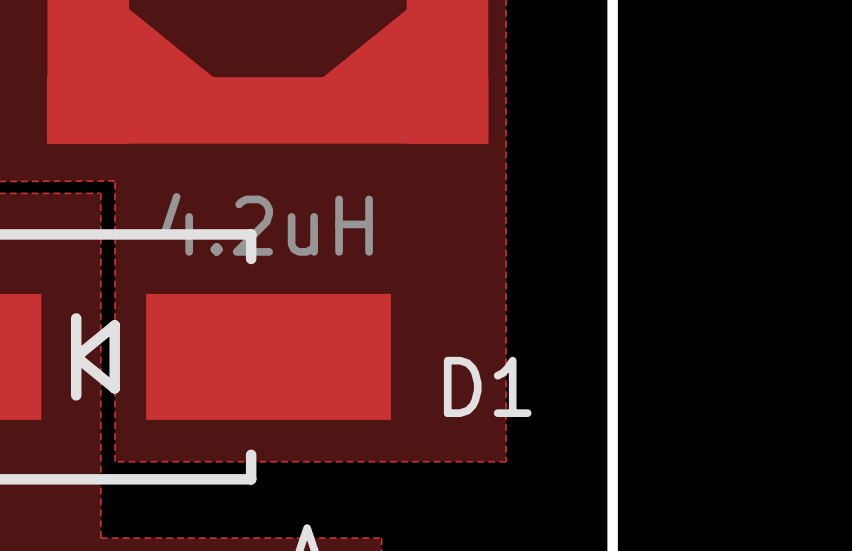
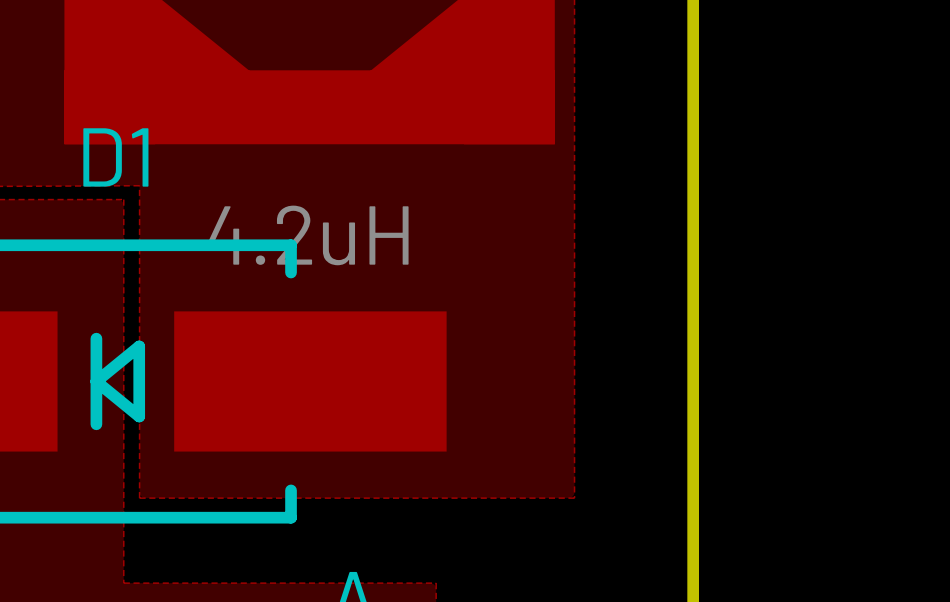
D1 name position: D1 (487, 386) -> D1 (115, 157)

